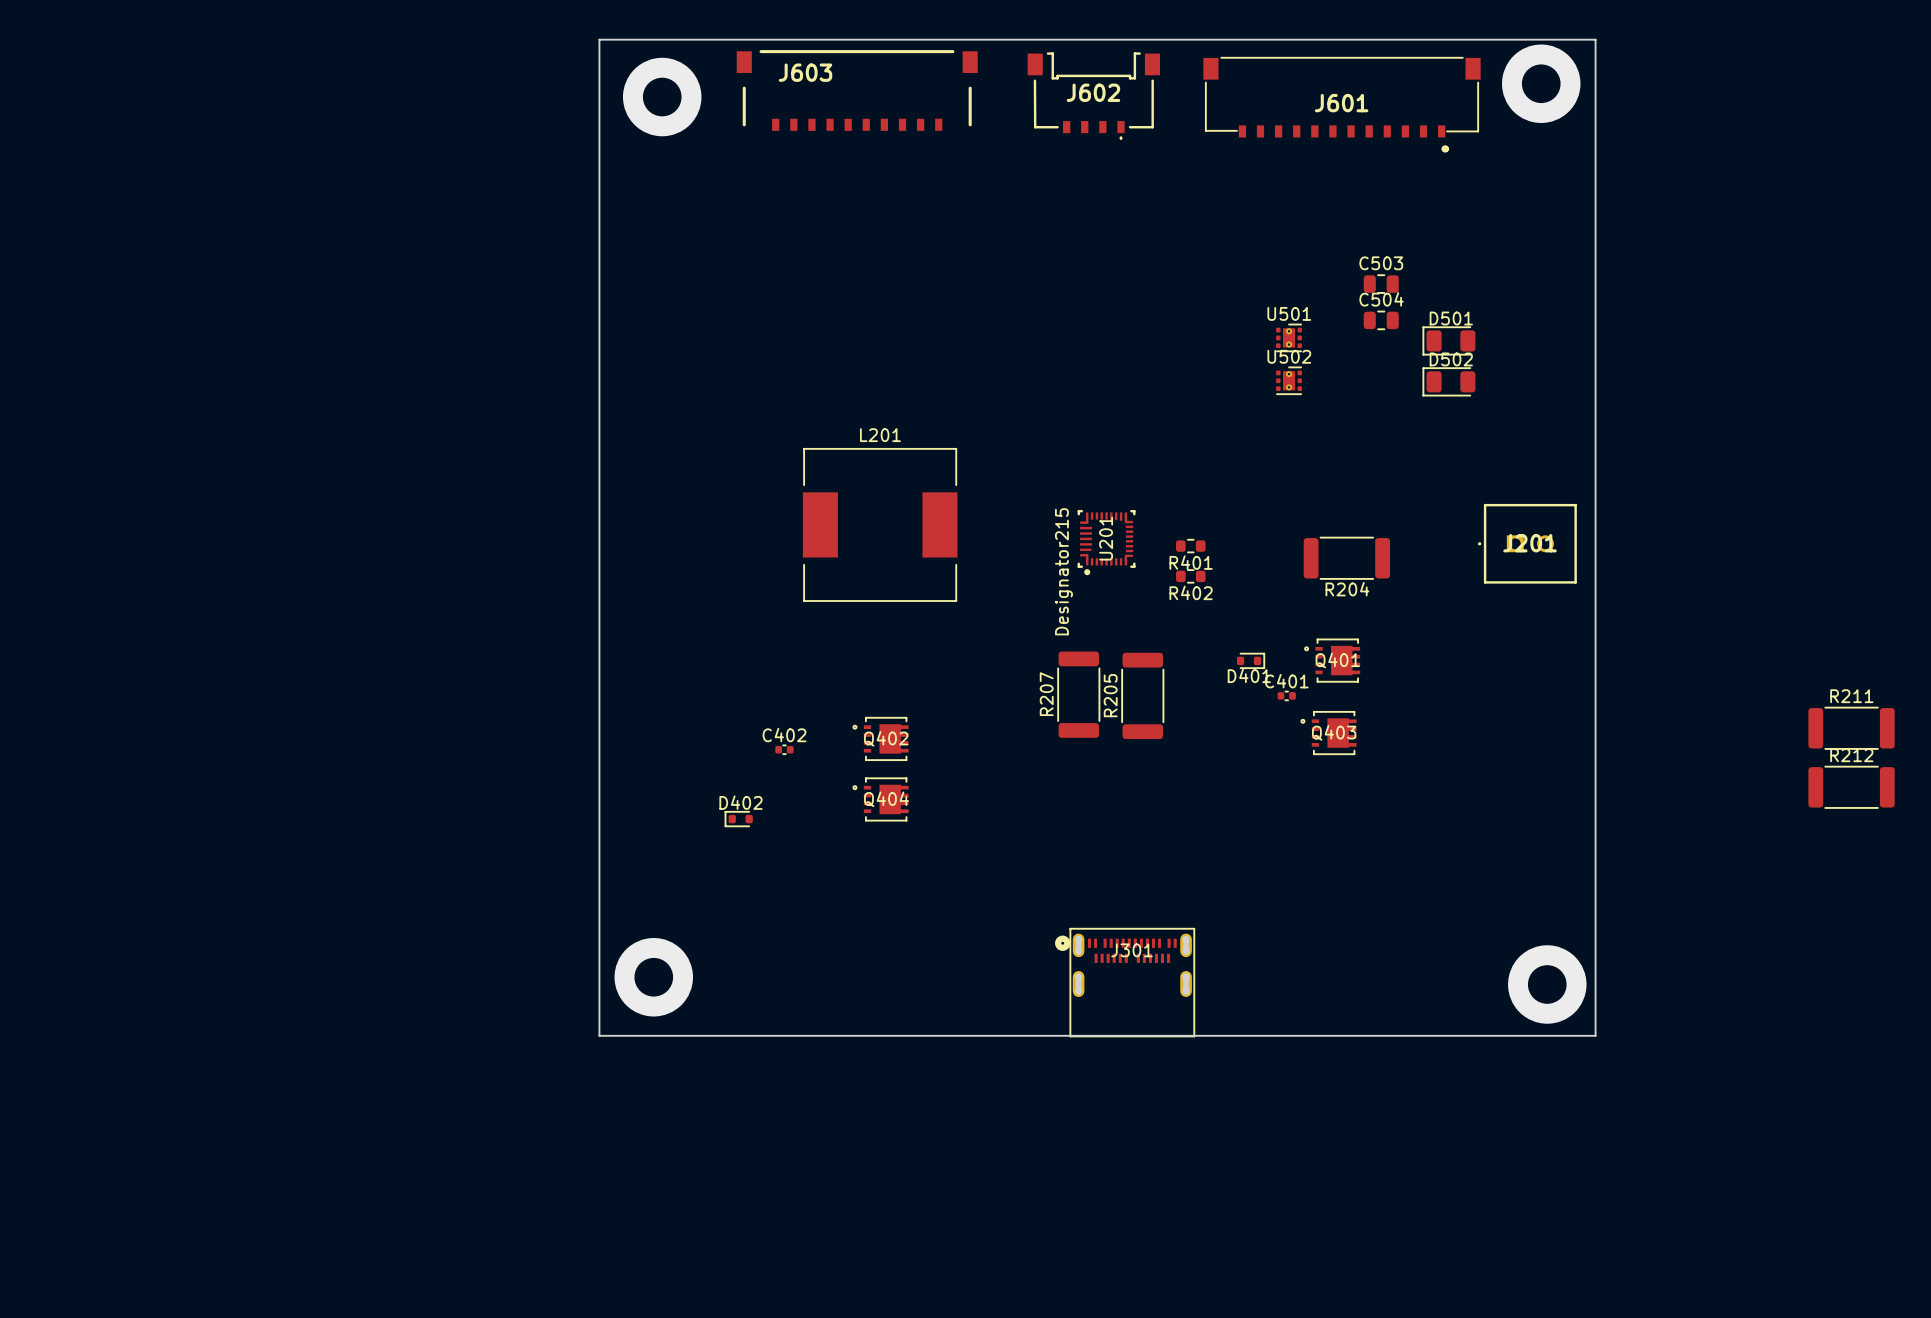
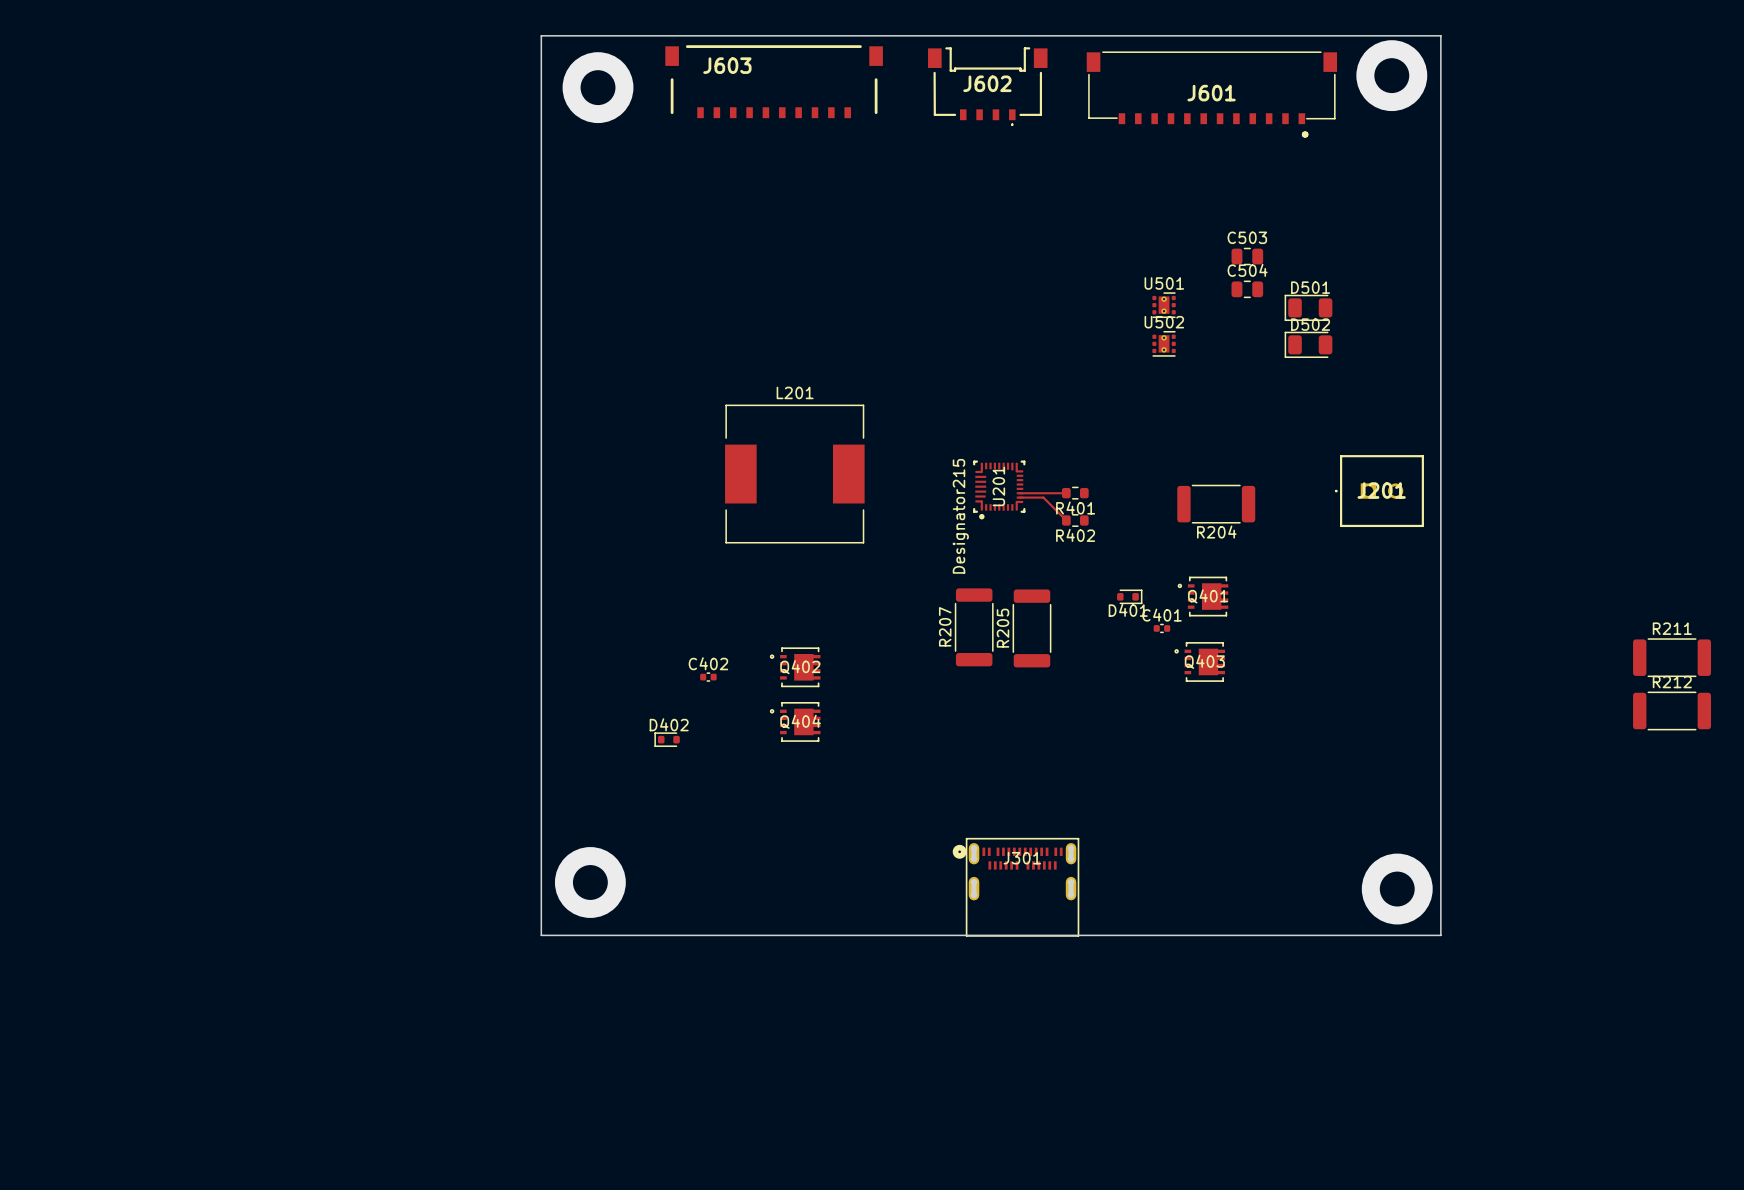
track: none -> (1019, 493) (1066, 493)
track: none -> (1019, 497) (1043, 497) (1066, 520)

